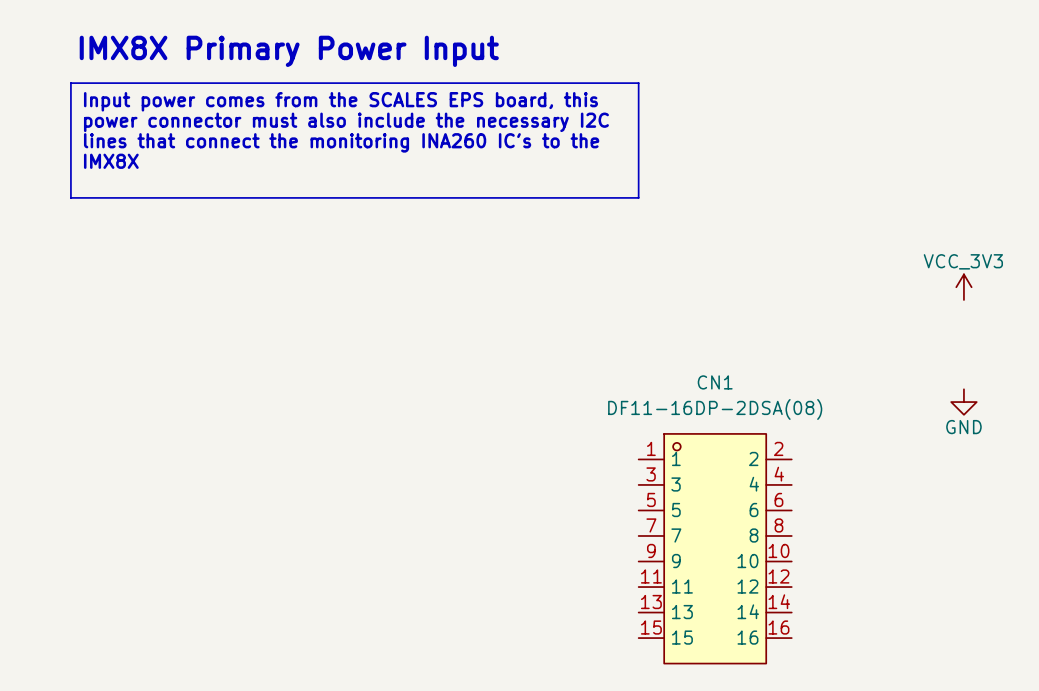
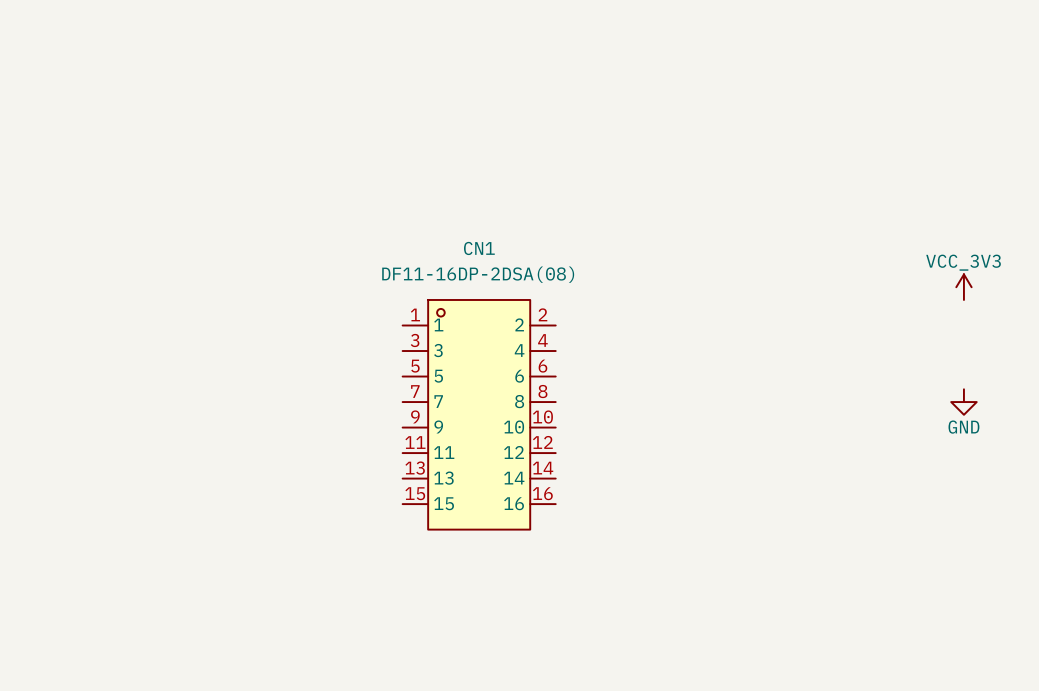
text: IMX8X Primary Power Input (289, 51) -> none
line: (70, 83) (638, 83) (638, 197) (70, 197) (70, 83) -> none
text: Input power comes from the SCALES EPS board, this (340, 101) -> none
text: power connector must also include the necessary I2C (346, 122) -> none
text: lines that connect the monitoring INA260 IC's to the (341, 142) -> none
text: IMX8X (111, 161) -> none
CN1 position: (715, 548) -> (479, 414)

